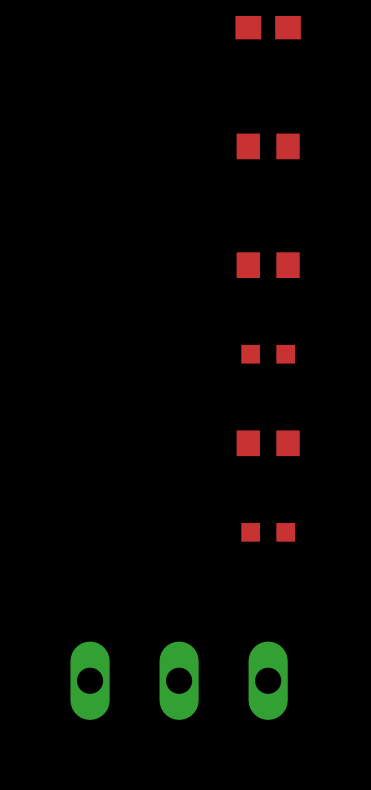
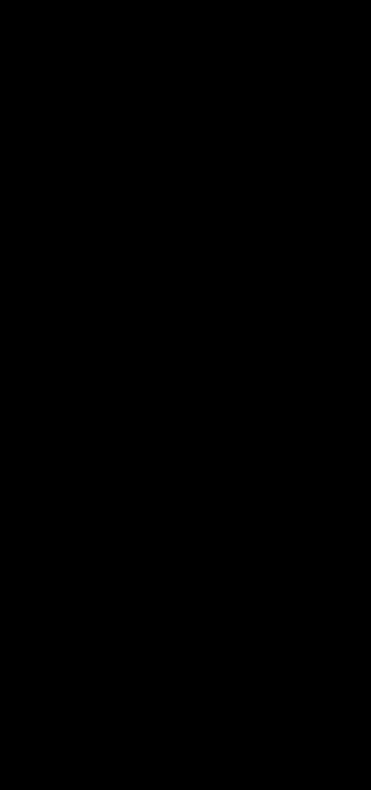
part: (268, 27) -> none
part: (268, 146) -> none
part: (268, 265) -> none
part: (268, 354) -> none
part: (268, 443) -> none
part: (268, 532) -> none
part: (179, 680) -> none

